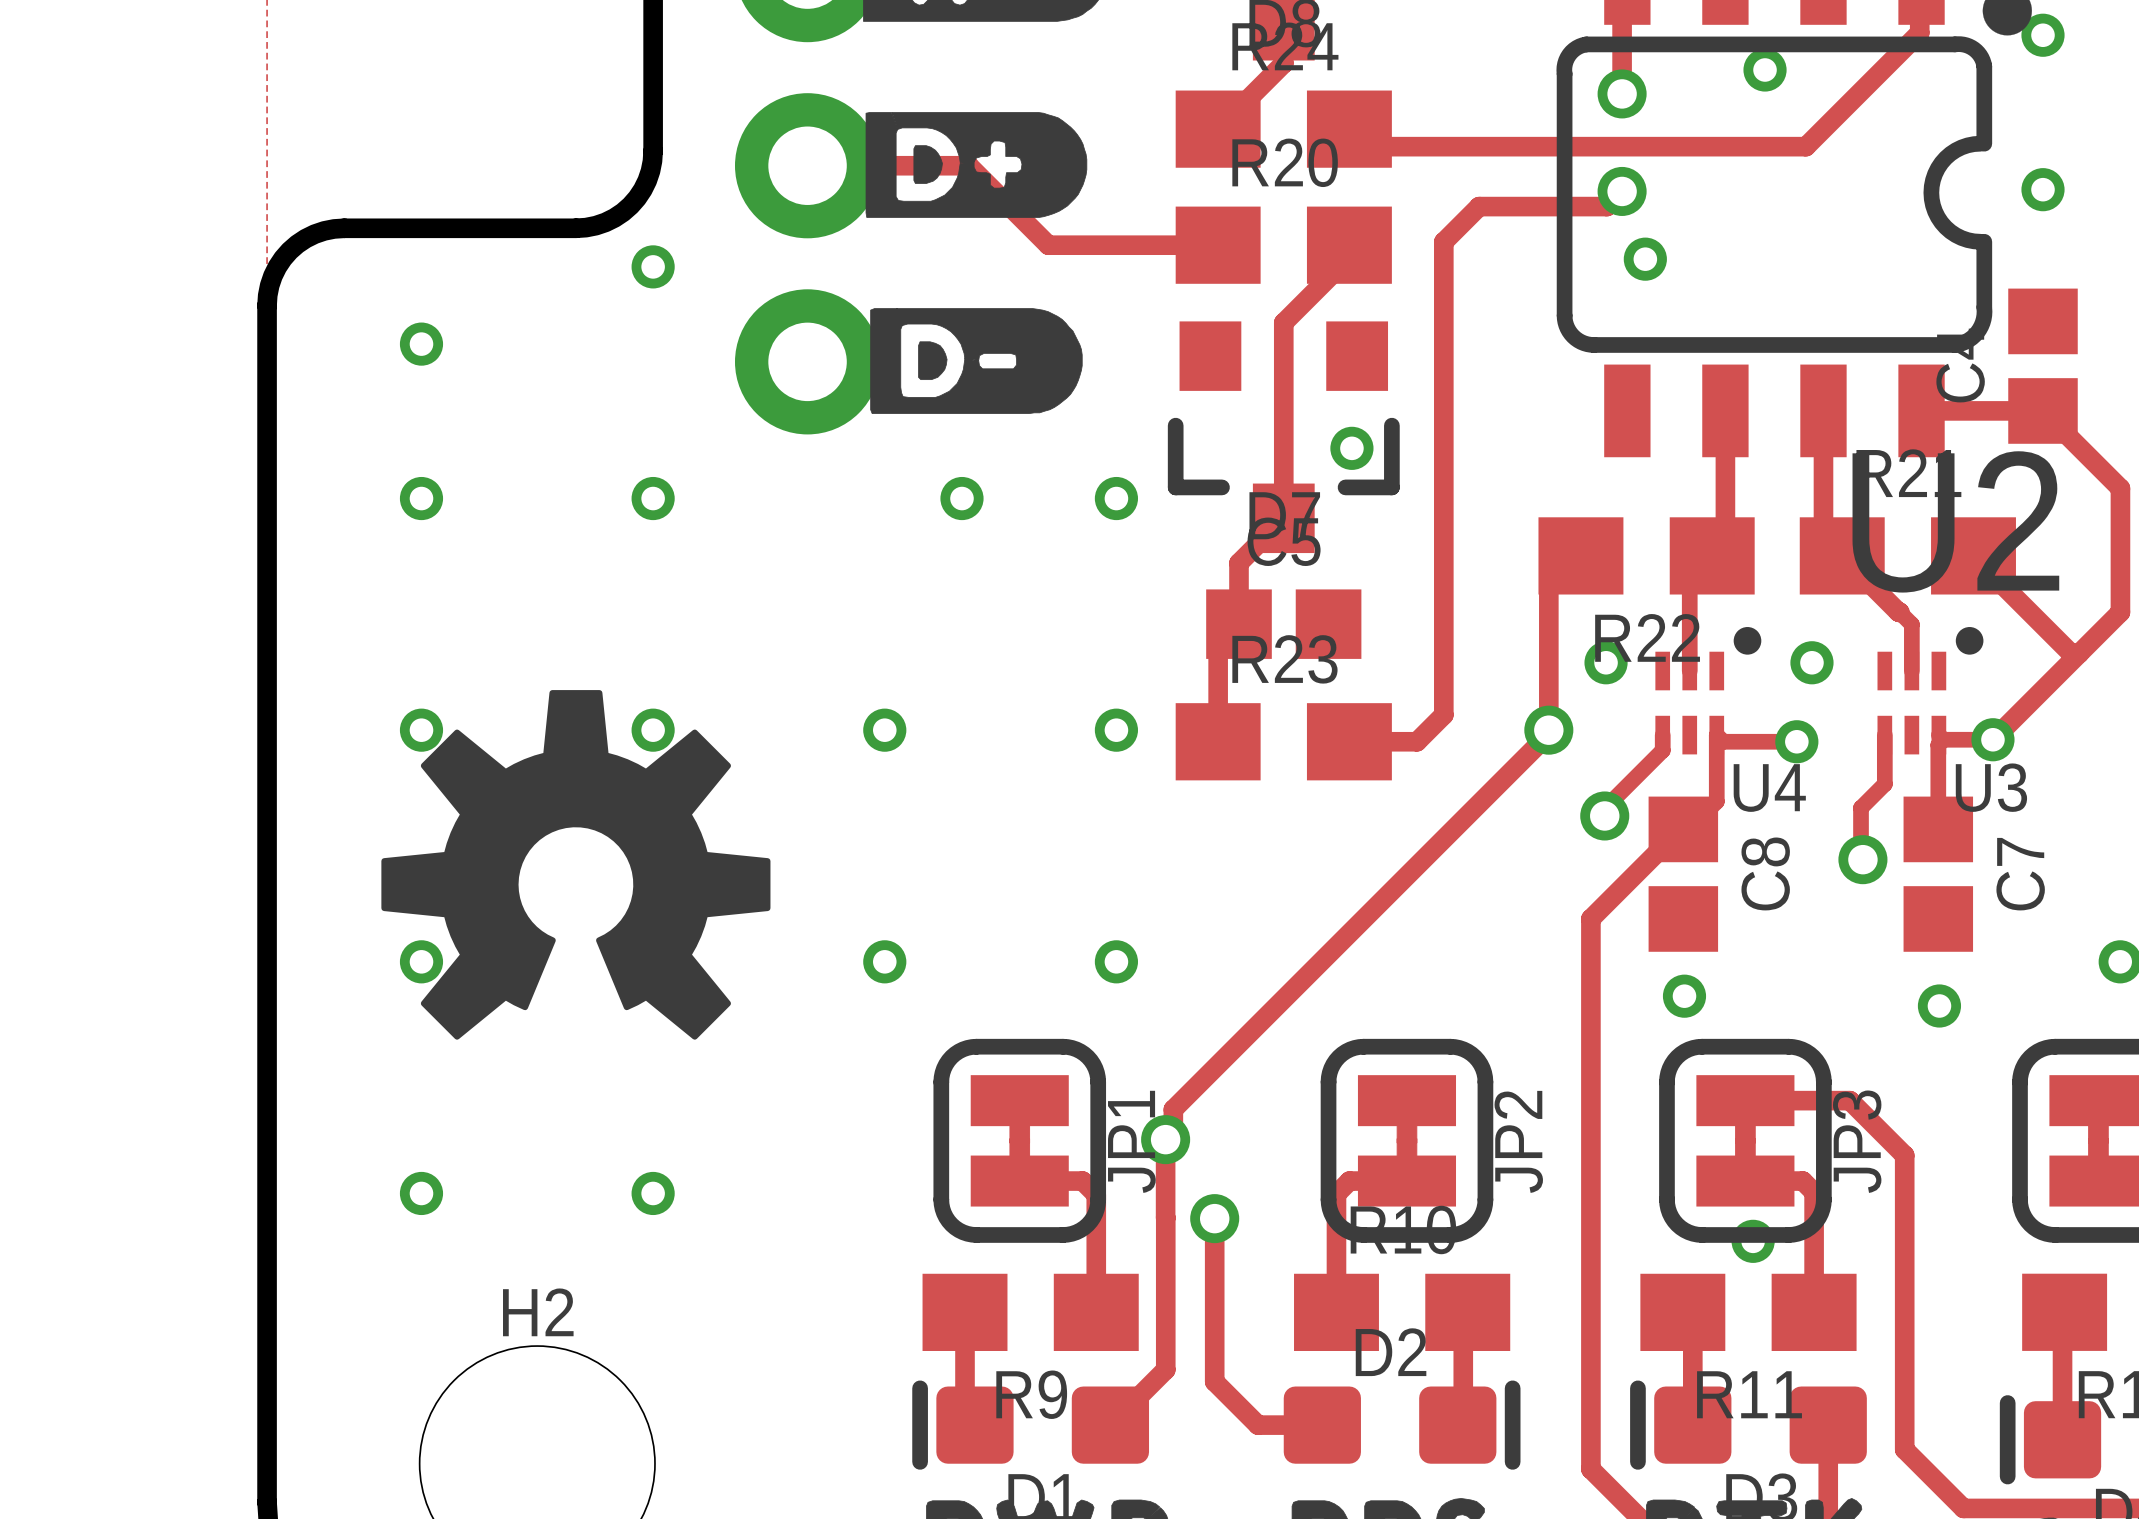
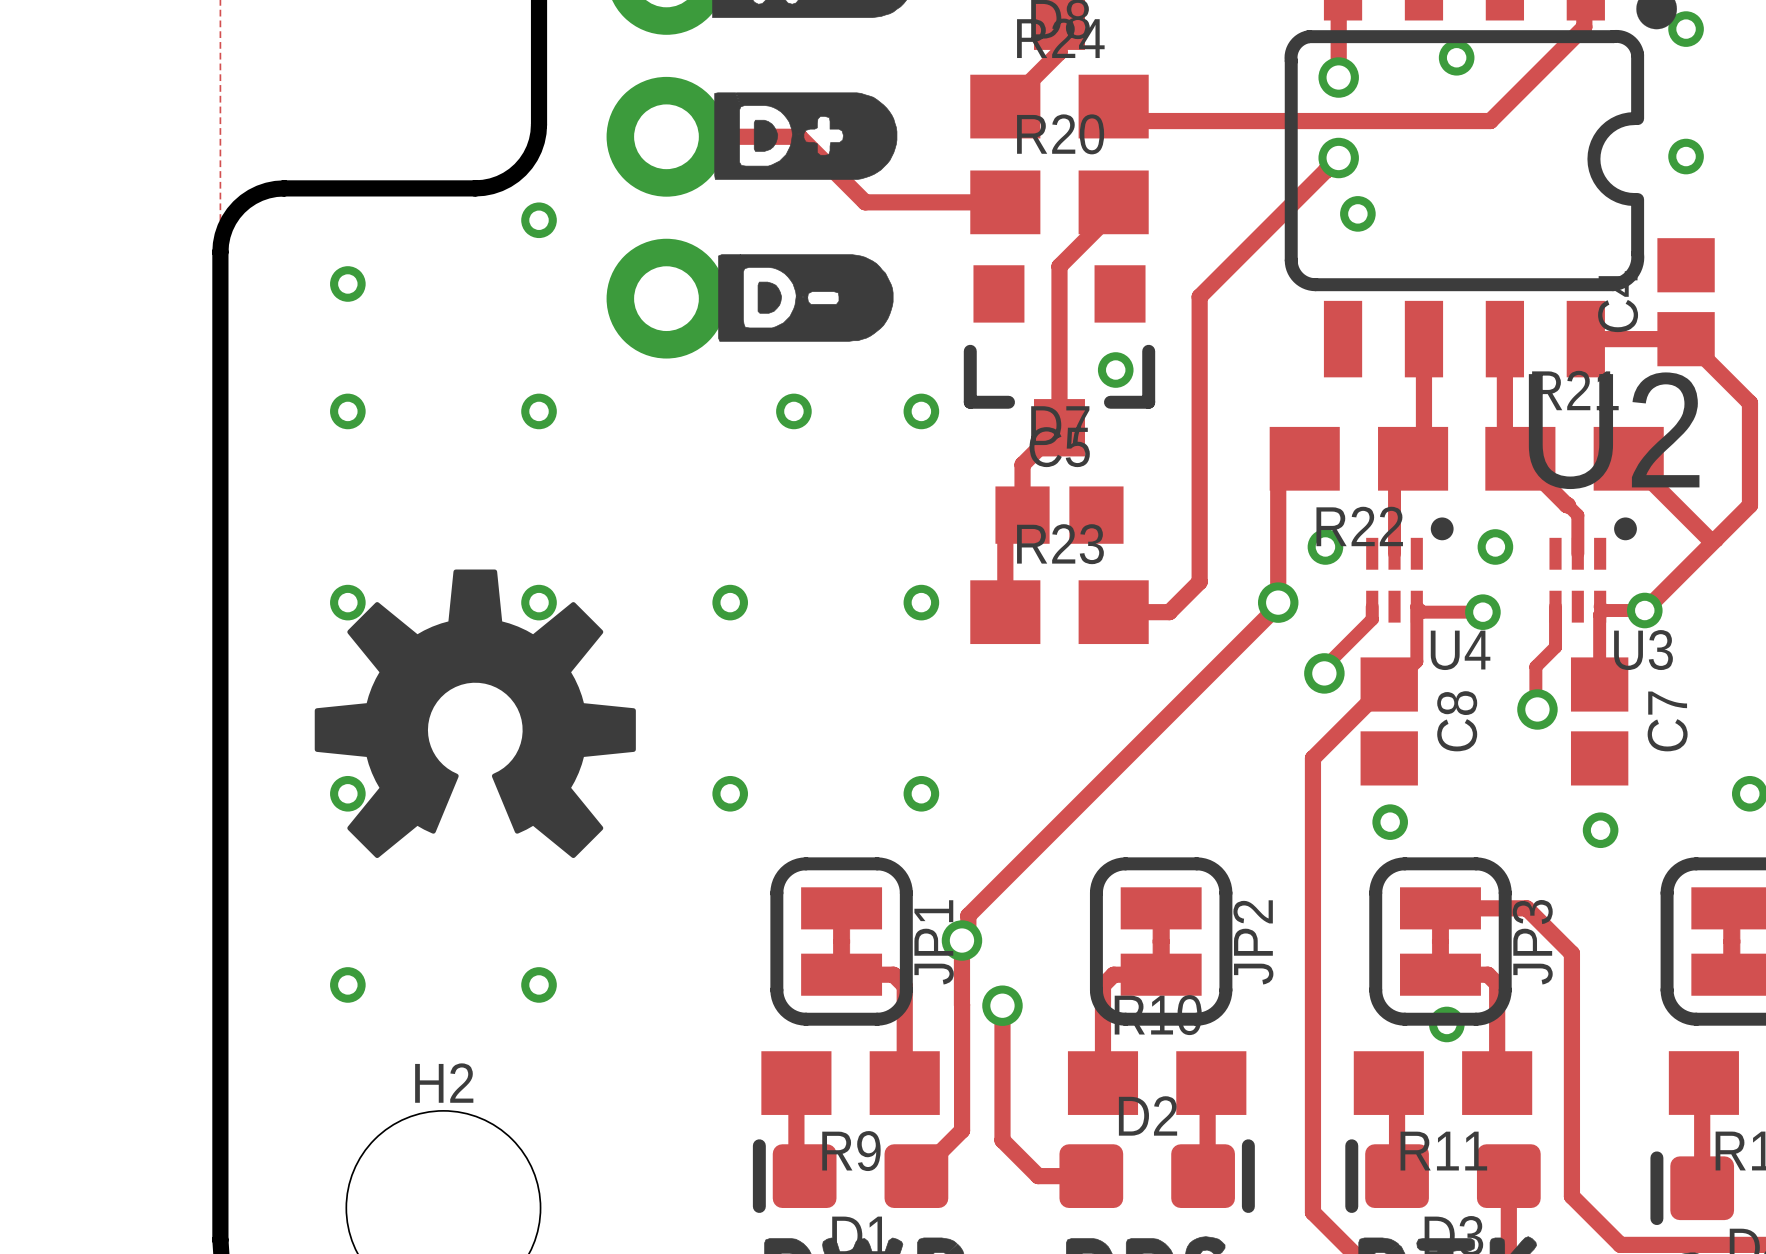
track: (1606, 206) (1479, 206) (1443, 241) (1443, 714) -> (1326, 170) (1199, 296) (1199, 581) (1191, 590)

